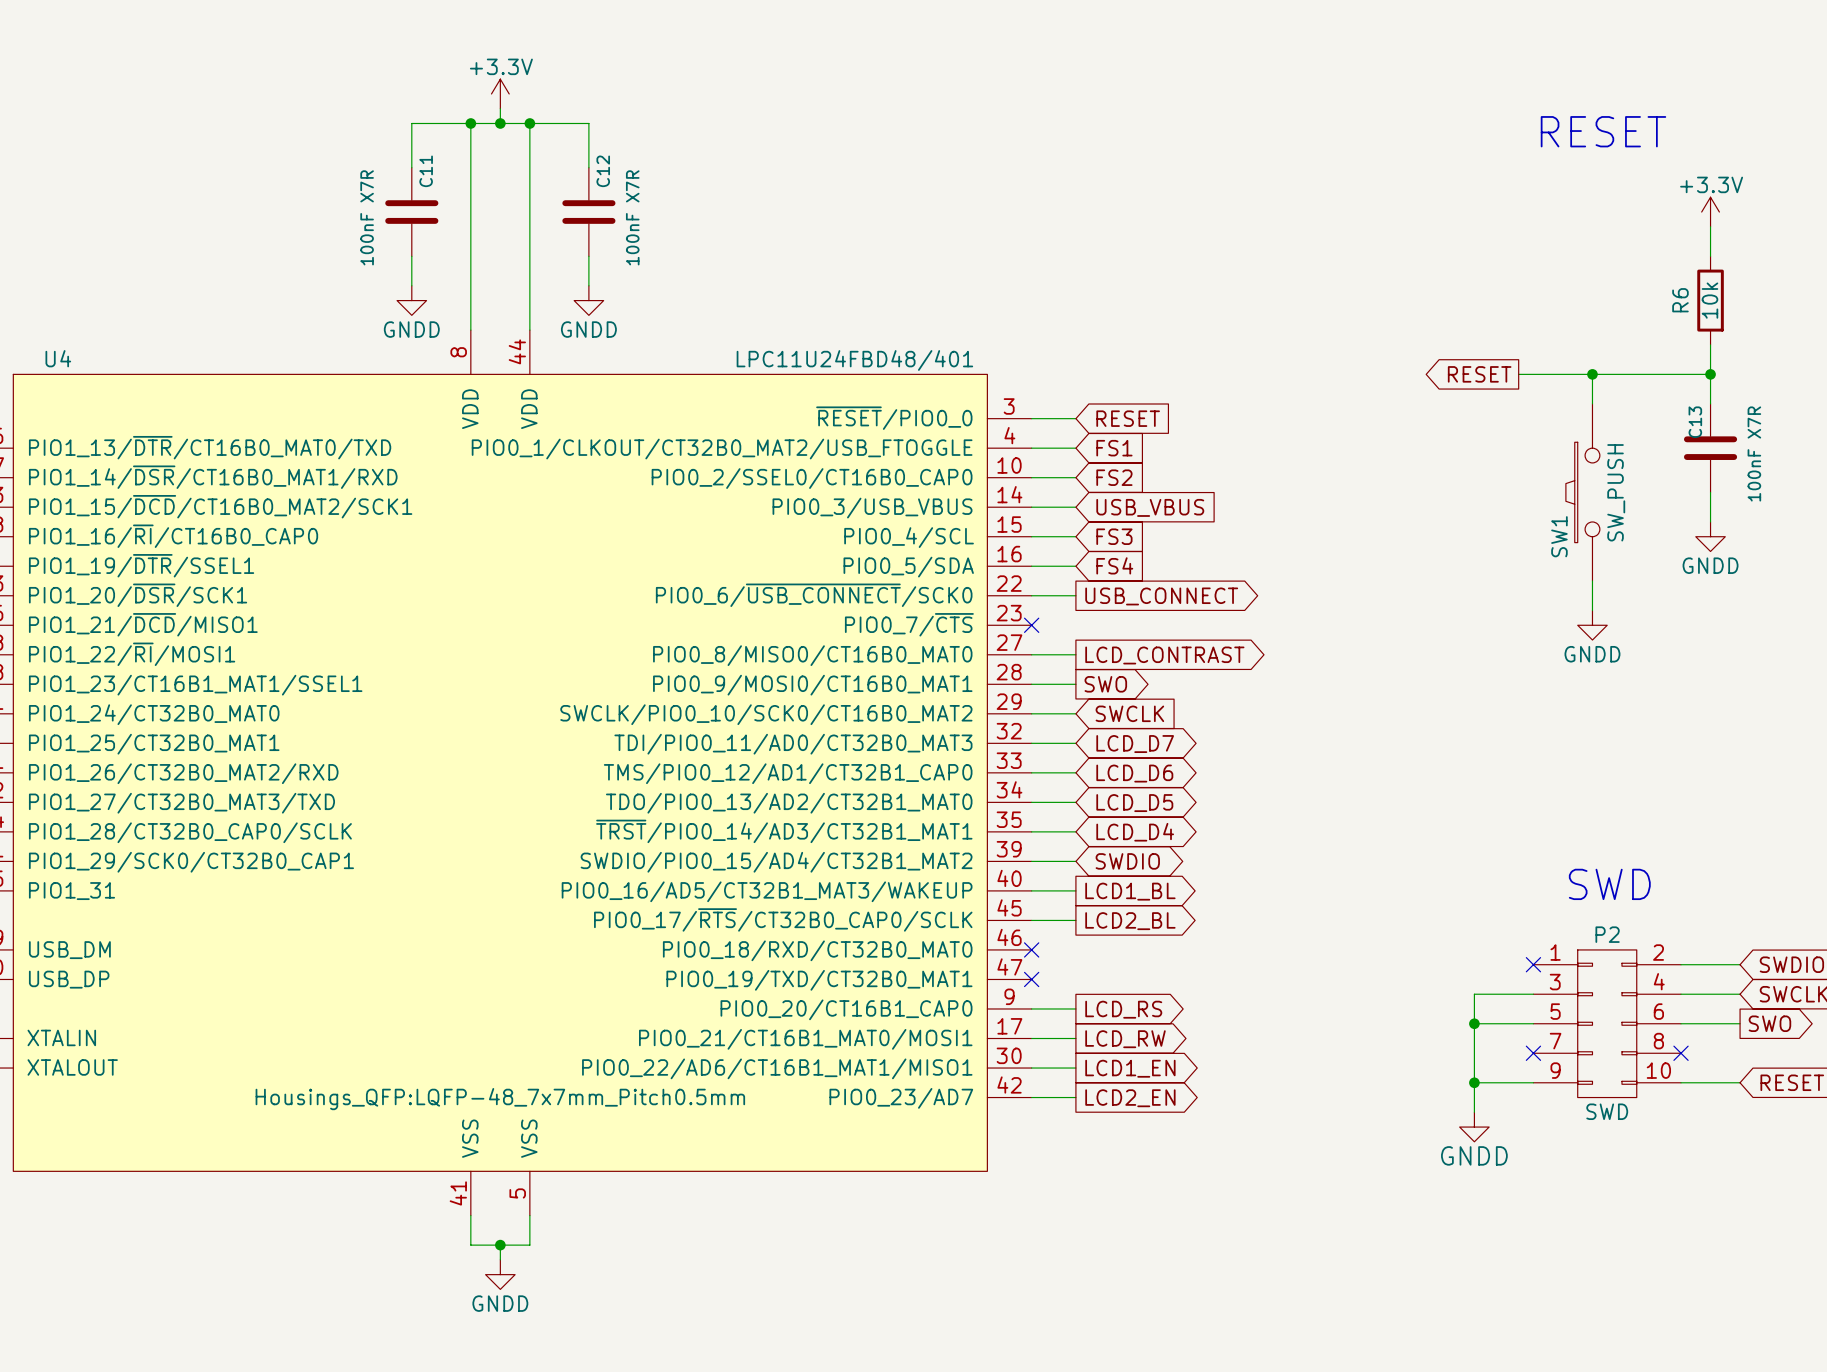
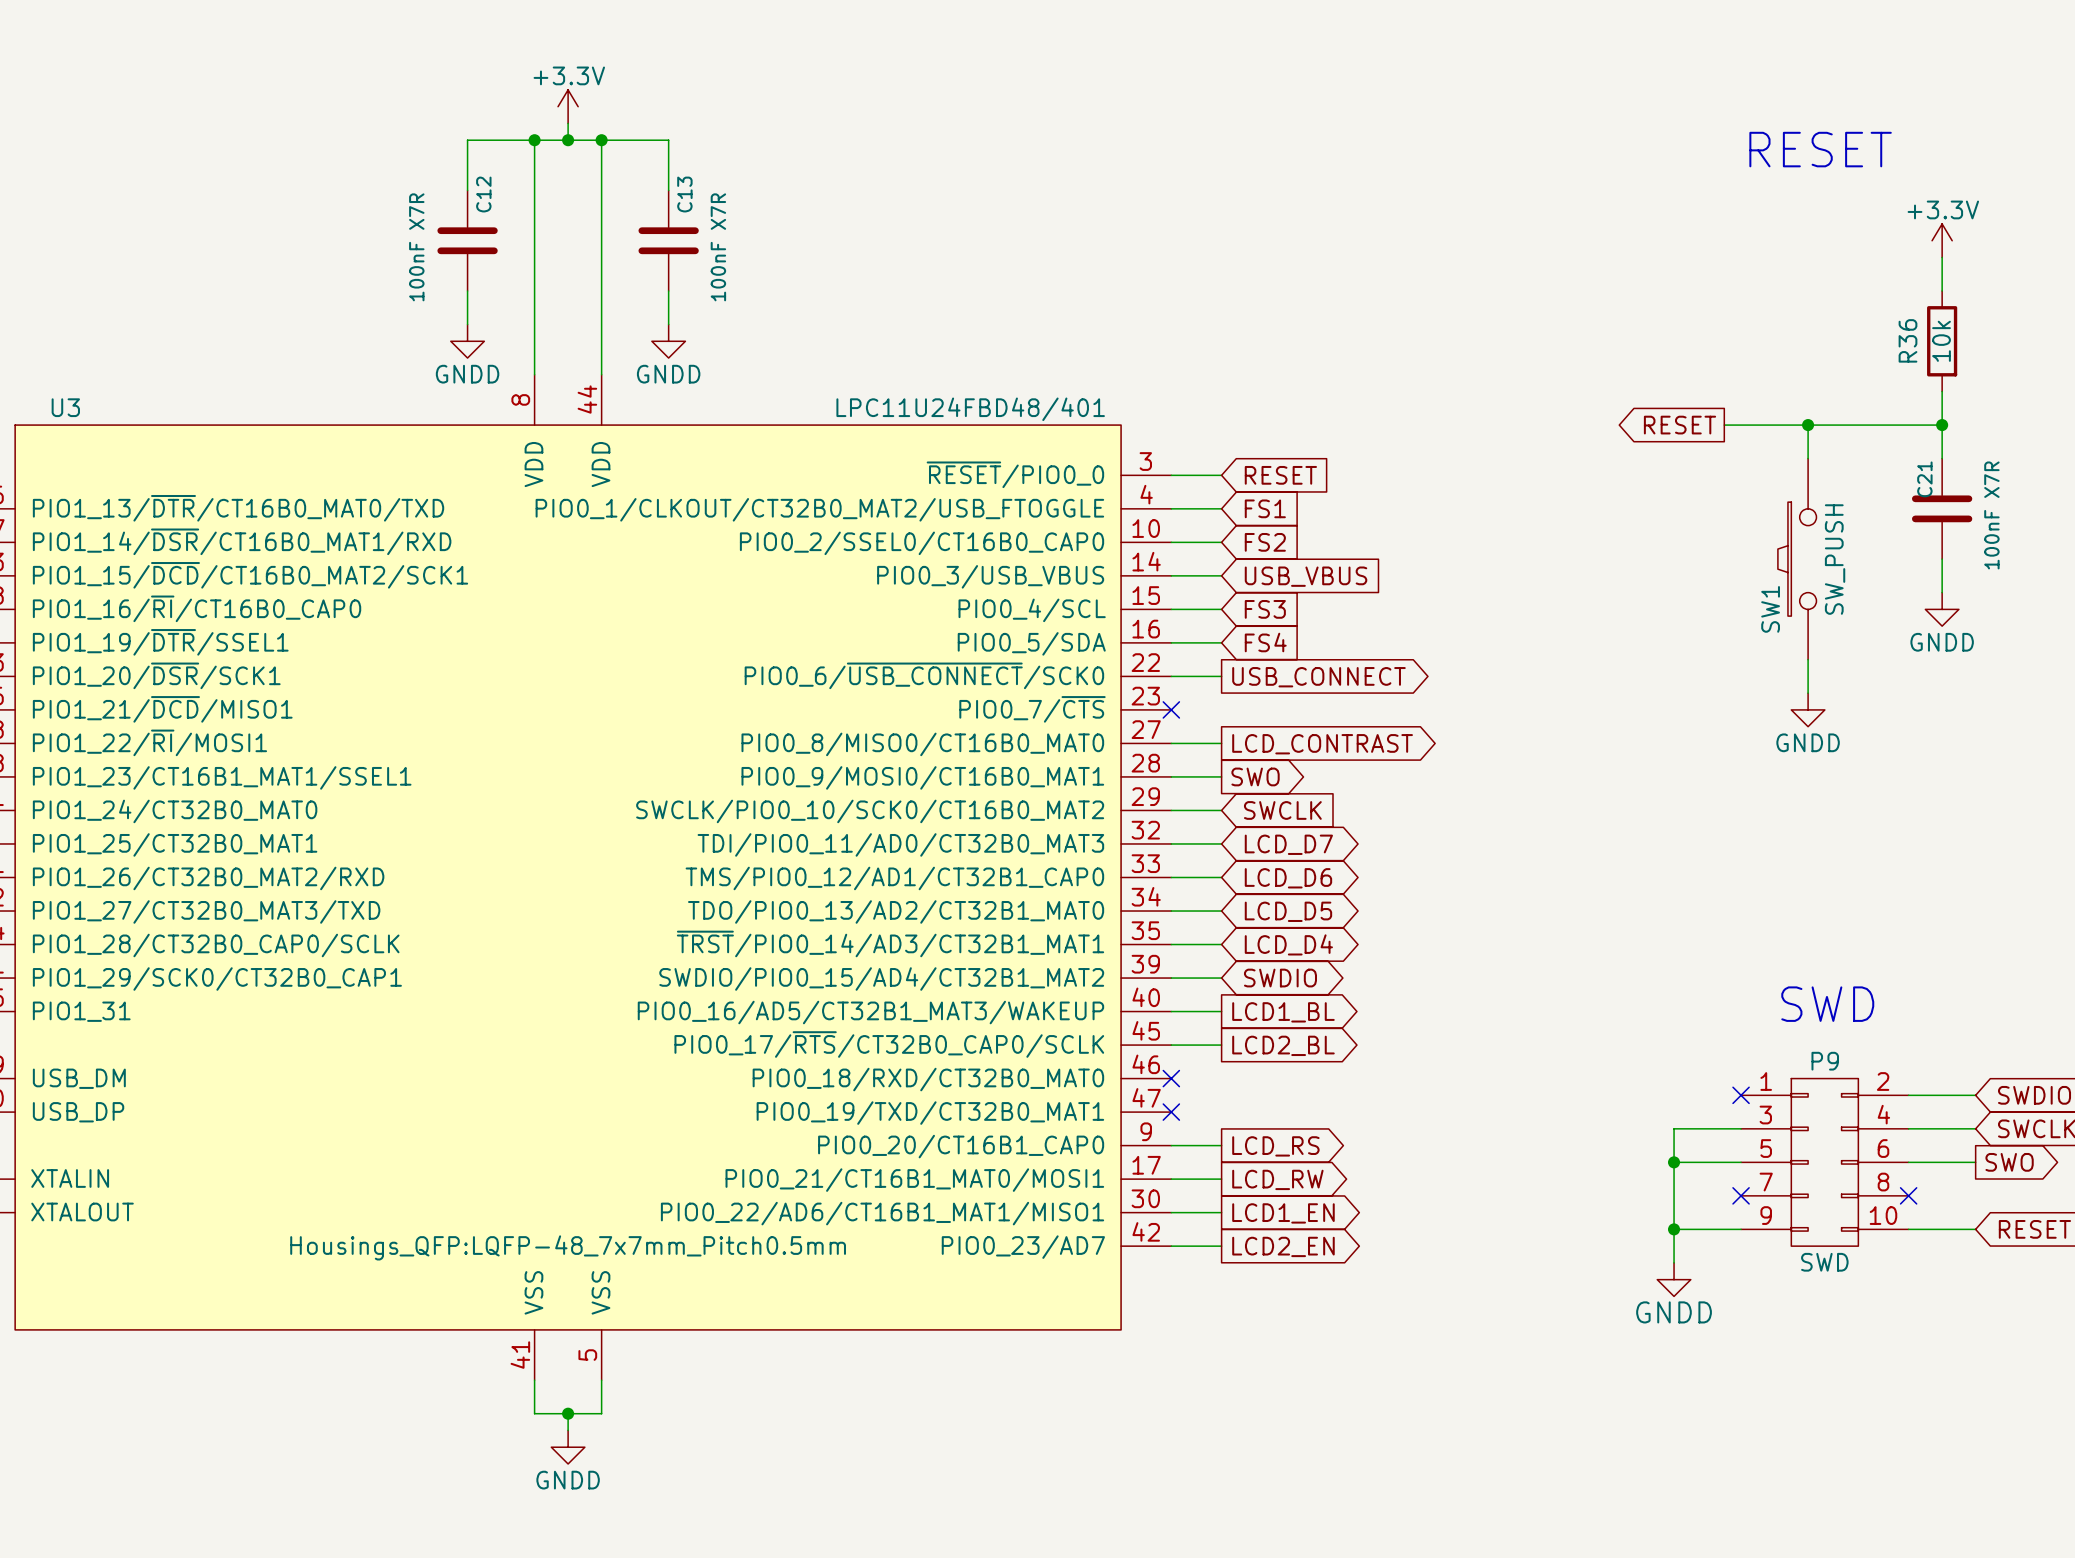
C11 name: C11 (426, 171) -> C12 (483, 194)
C12 name: C12 (603, 171) -> C13 (684, 194)
R6 name: R6 (1680, 300) -> R36 (1907, 340)
U4 name: U4 (58, 358) -> U3 (65, 407)
C13 name: C13 (1695, 422) -> C21 (1924, 479)
P2 name: P2 (1607, 934) -> P9 (1825, 1061)

